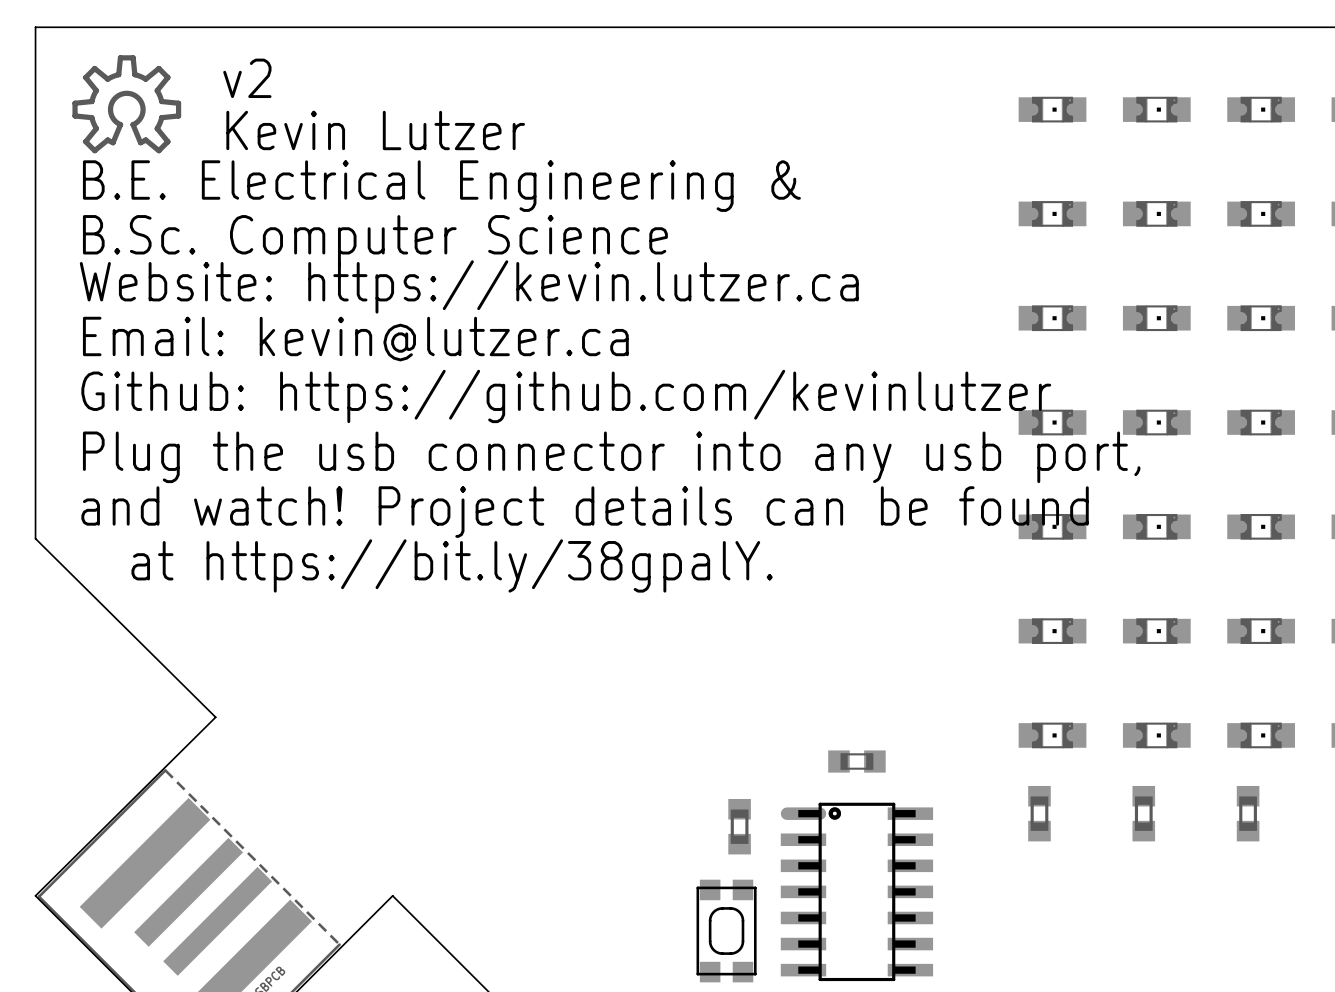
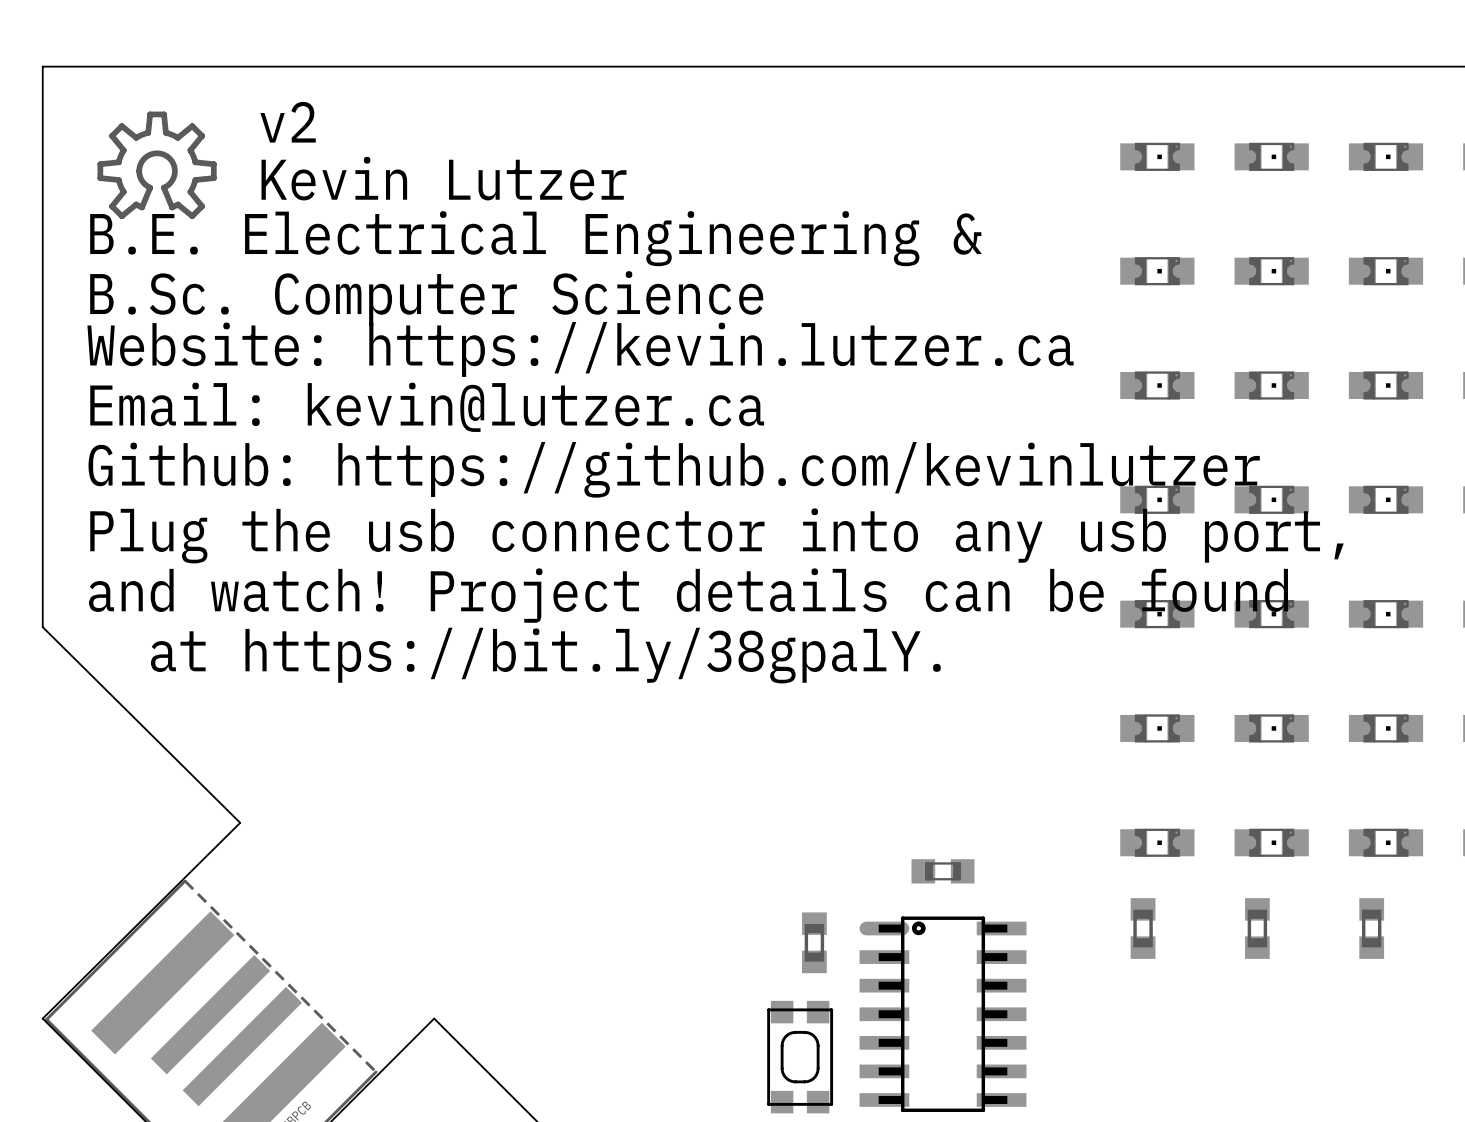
text position: v2 (247, 78) -> v2 (288, 122)
drawing position: (126, 104) -> (157, 165)
text position: Kevin Lutzer (375, 130) -> Kevin Lutzer (443, 178)

